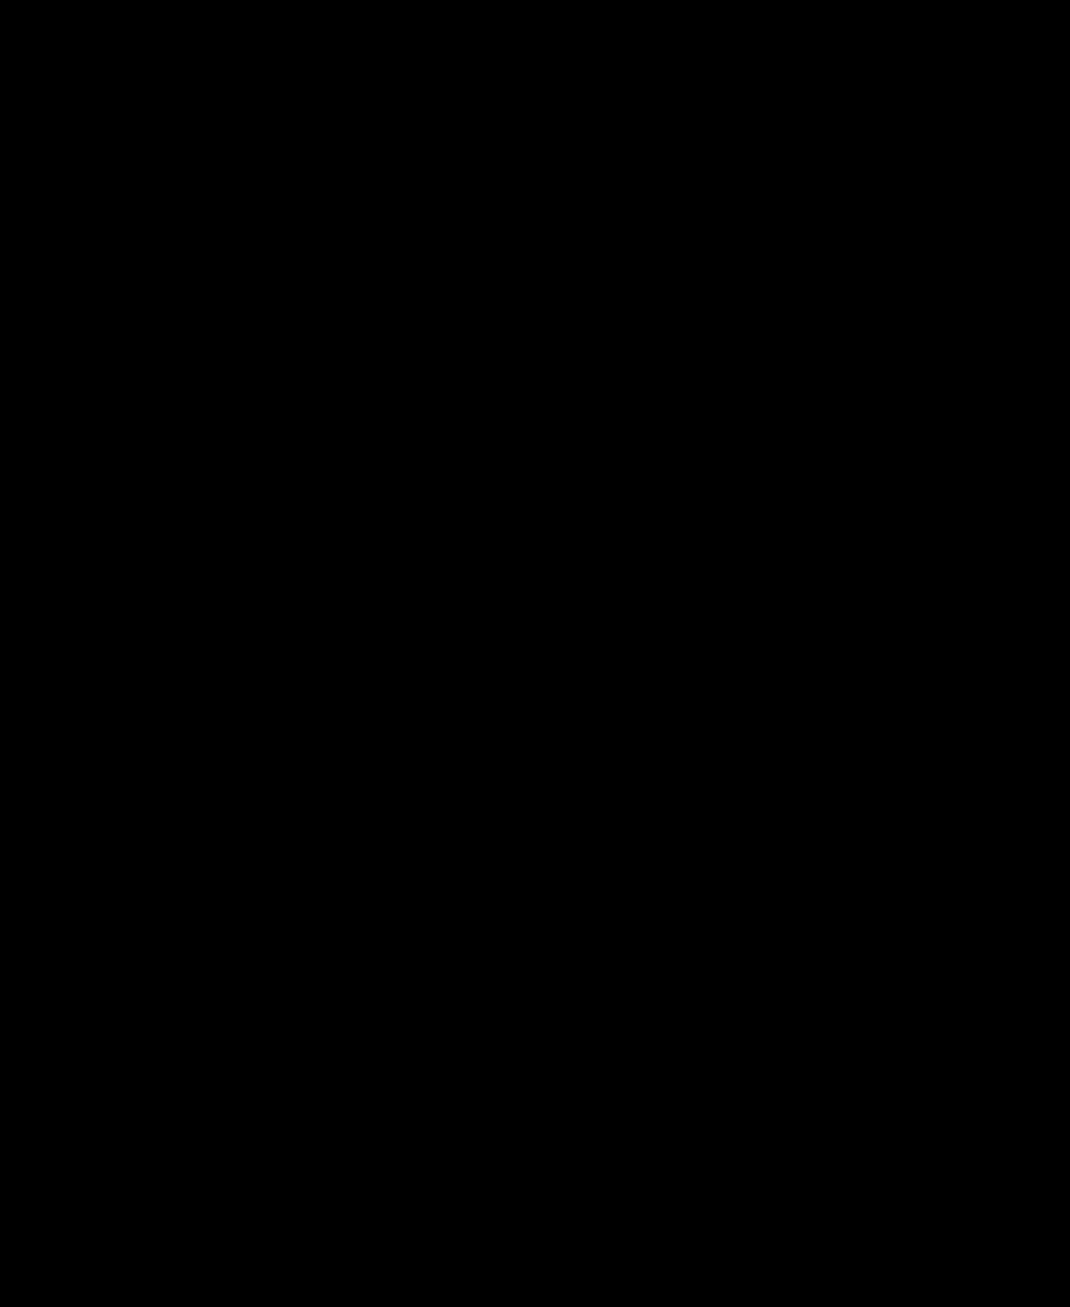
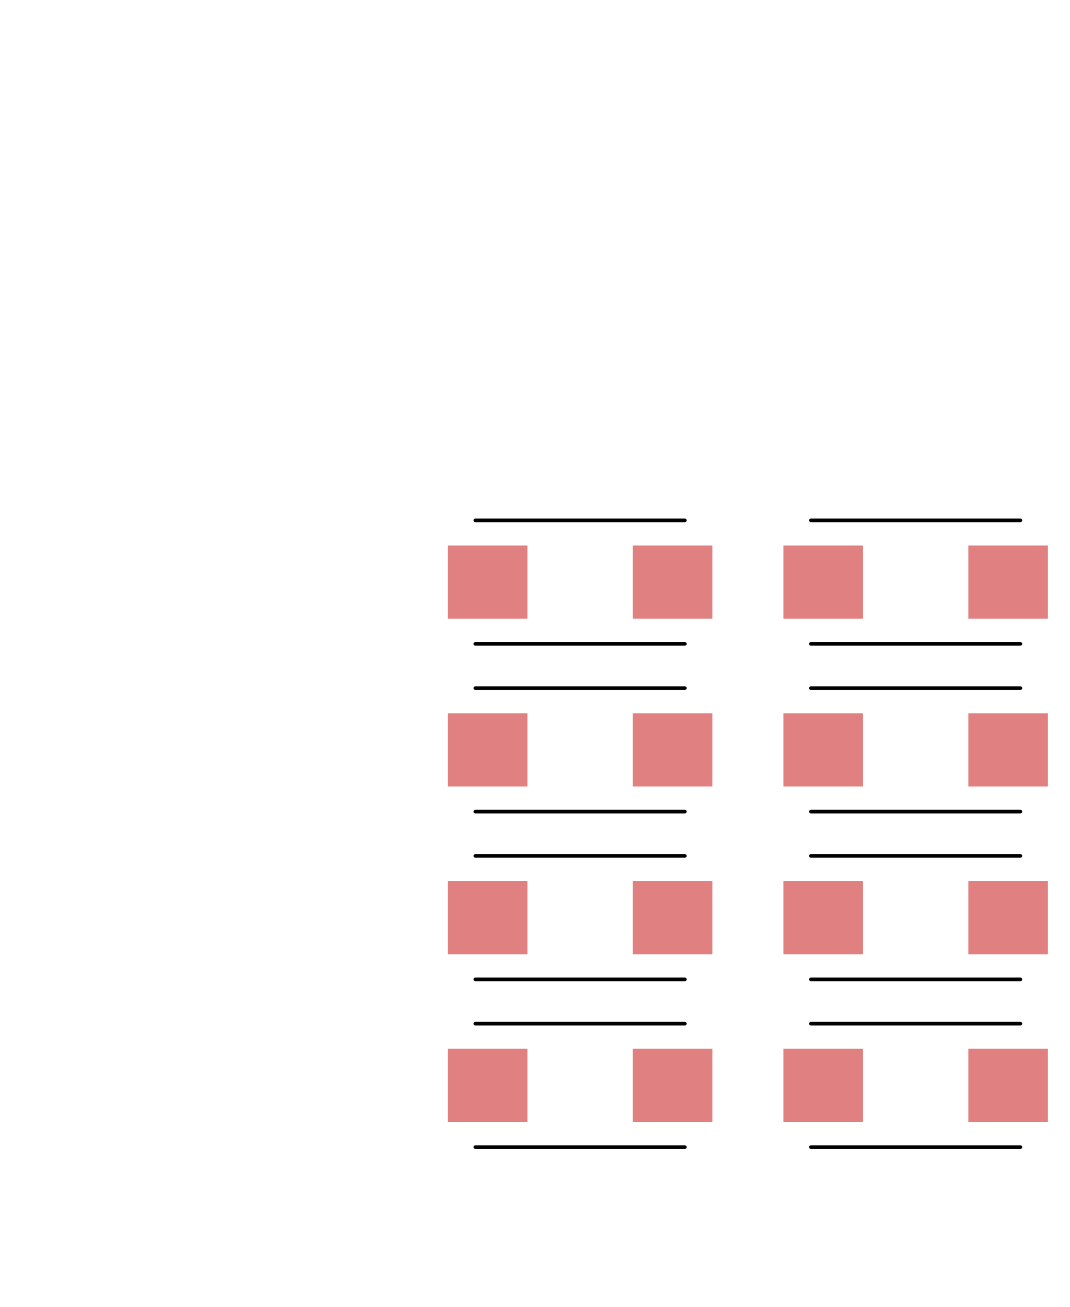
part: none -> (580, 582)
part: none -> (915, 582)
part: none -> (580, 749)
part: none -> (915, 749)
part: none -> (580, 917)
part: none -> (915, 917)
part: none -> (580, 1085)
part: none -> (915, 1085)

